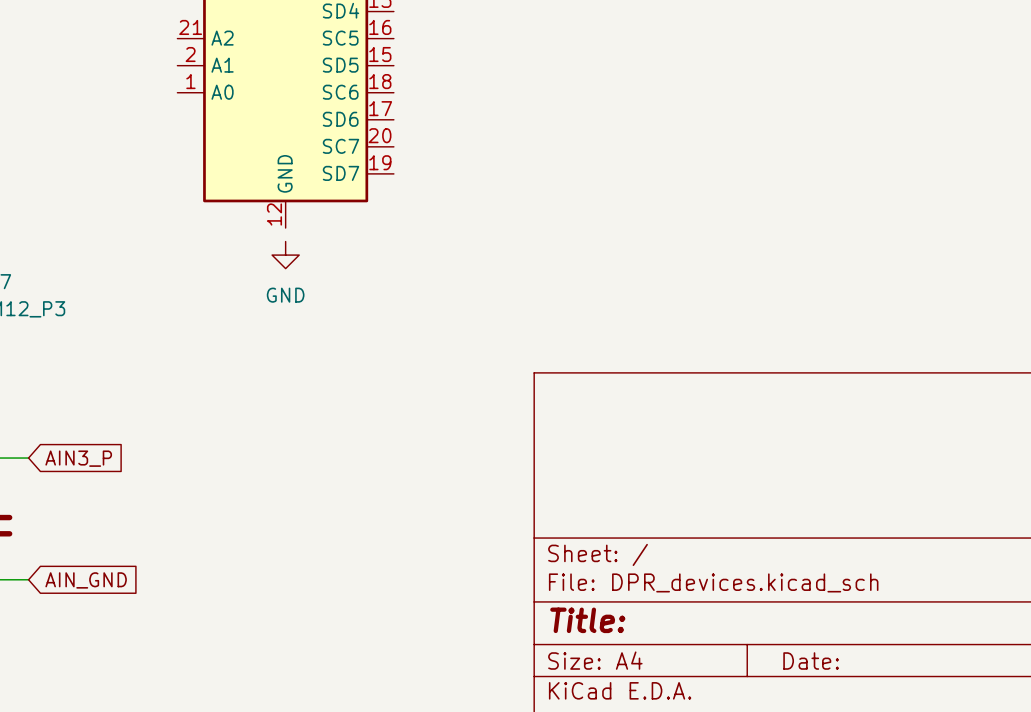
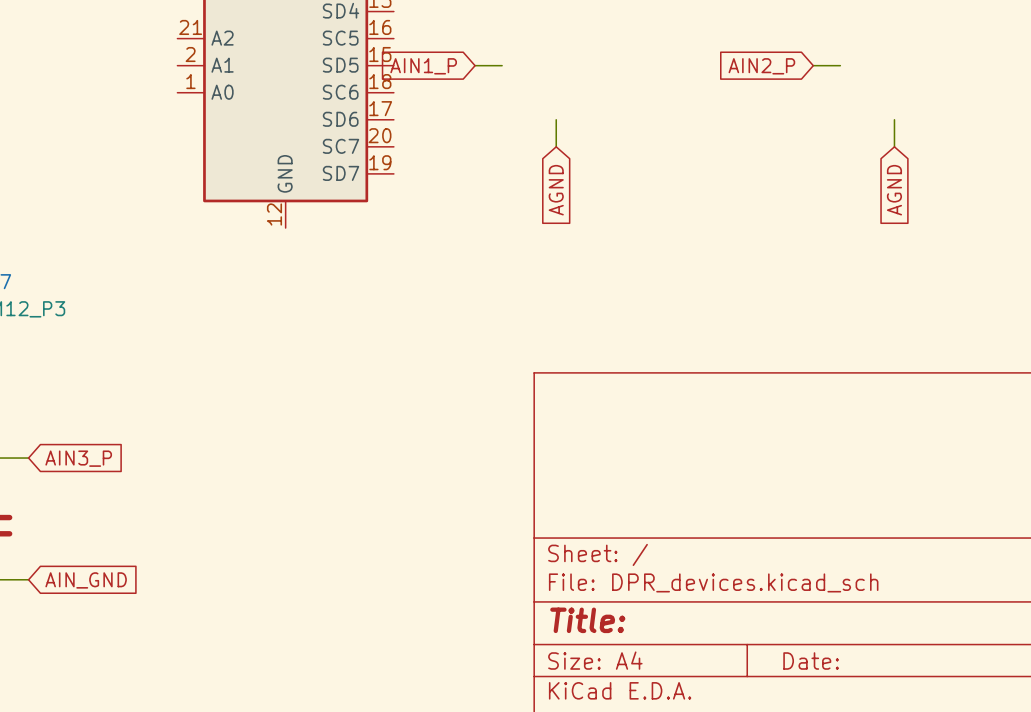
wire: none -> (475, 65) (502, 65)
wire: none -> (813, 65) (840, 65)
global label: none -> AIN1_P (423, 66)
global label: none -> AIN2_P (761, 66)
wire: none -> (556, 119) (556, 146)
wire: none -> (894, 119) (894, 146)
global label: none -> AGND (556, 190)
global label: none -> AGND (894, 190)
power symbol: GND (285, 255) -> none

